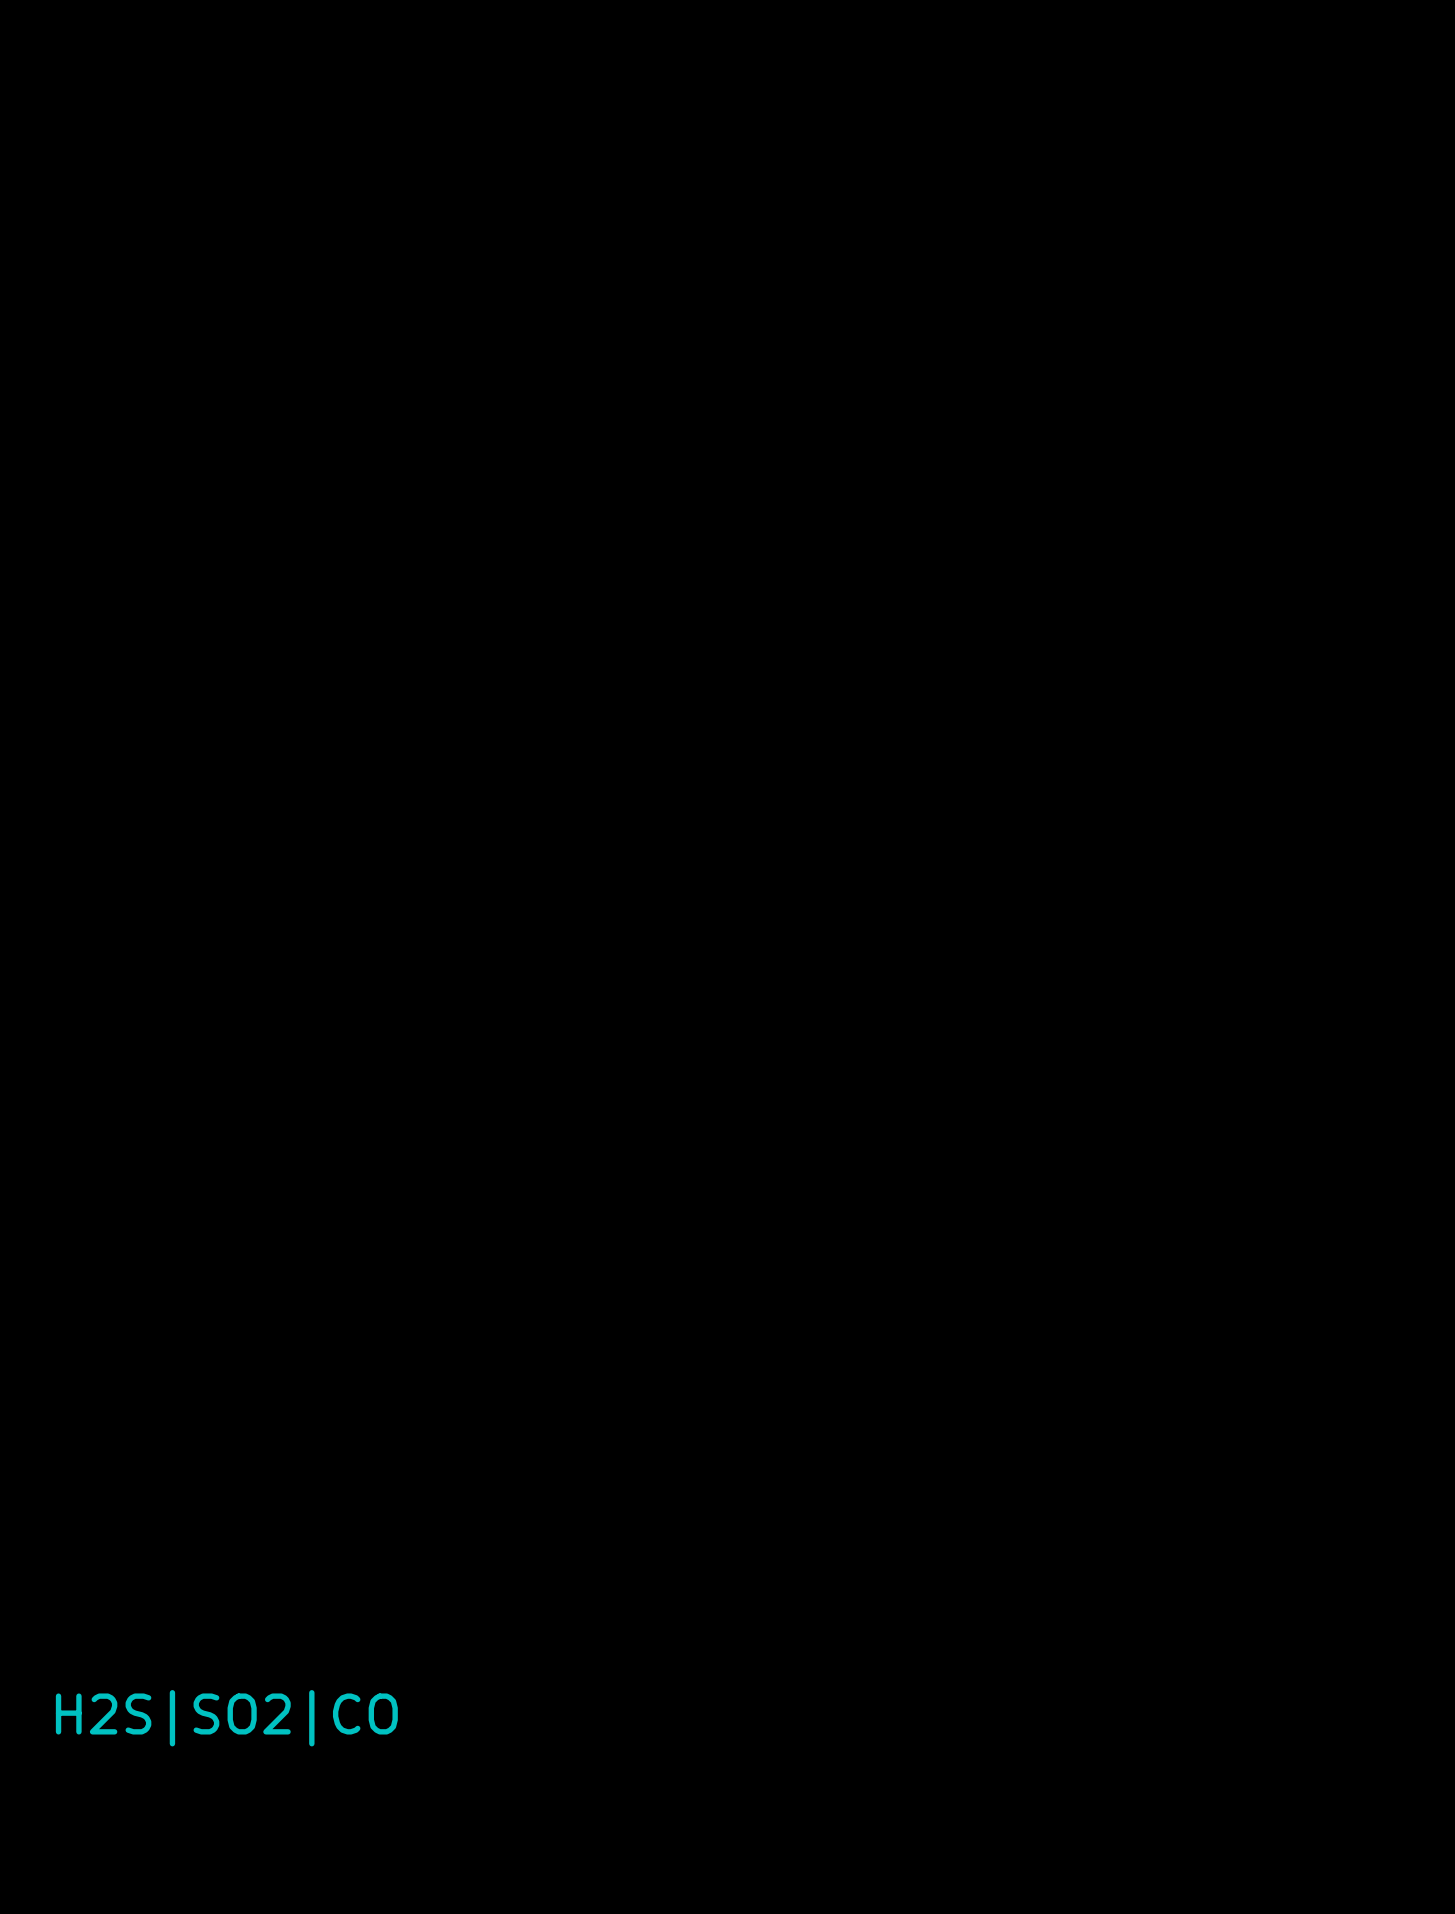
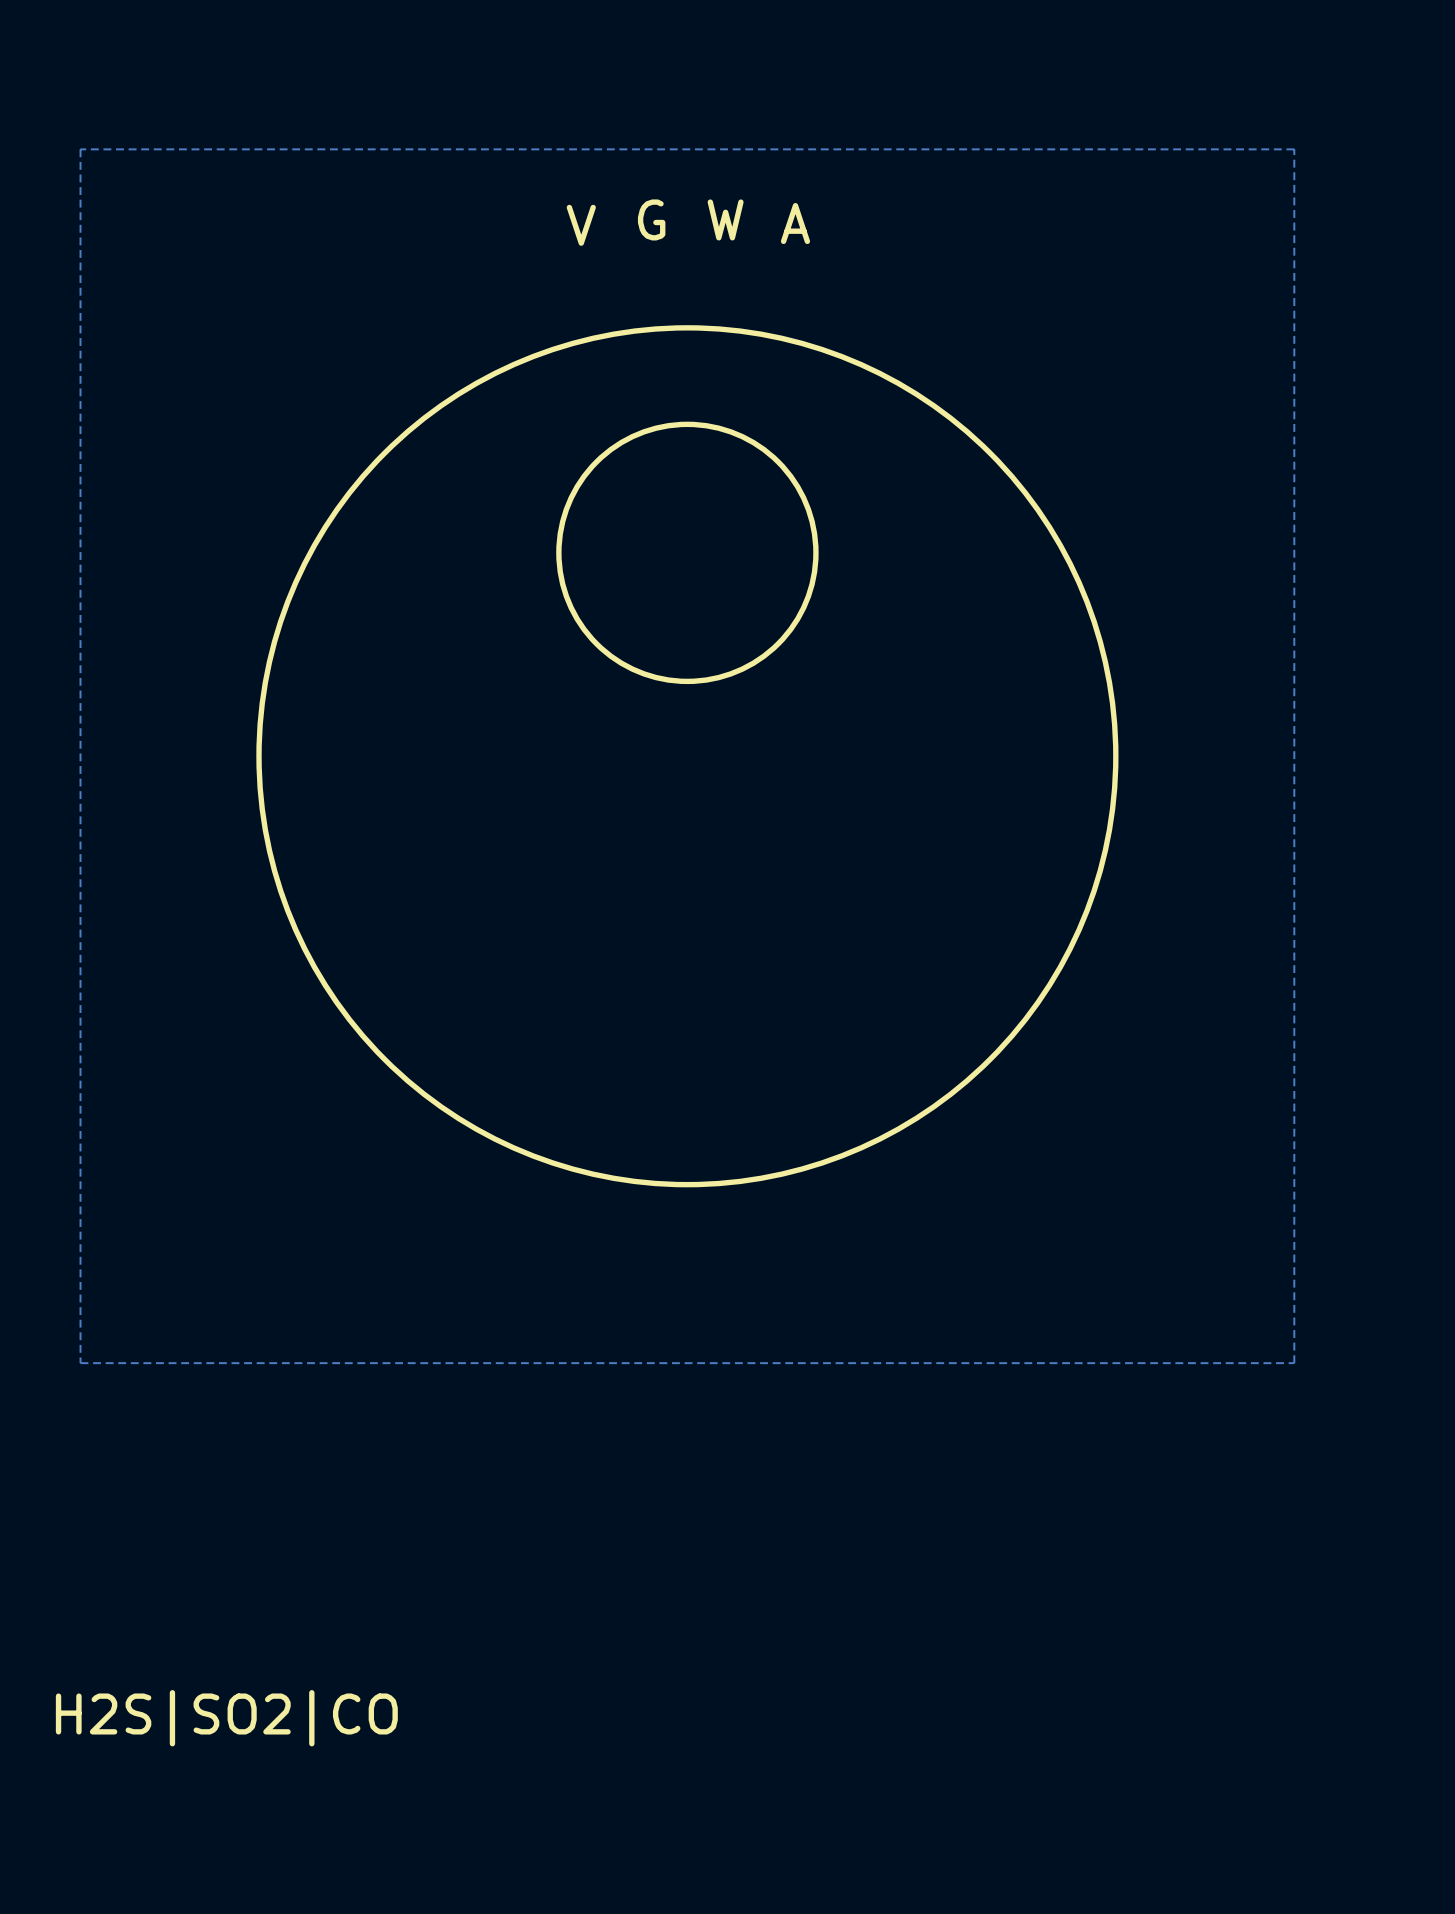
zone outline: none -> (1294, 149) (80, 149) (80, 1363) (1294, 1363) (1294, 149)
text: none -> G (651, 219)
text: none -> W (725, 219)
text: none -> A (795, 223)
text: none -> V (581, 225)
drawing: none -> [256, 325, 1119, 1188]

